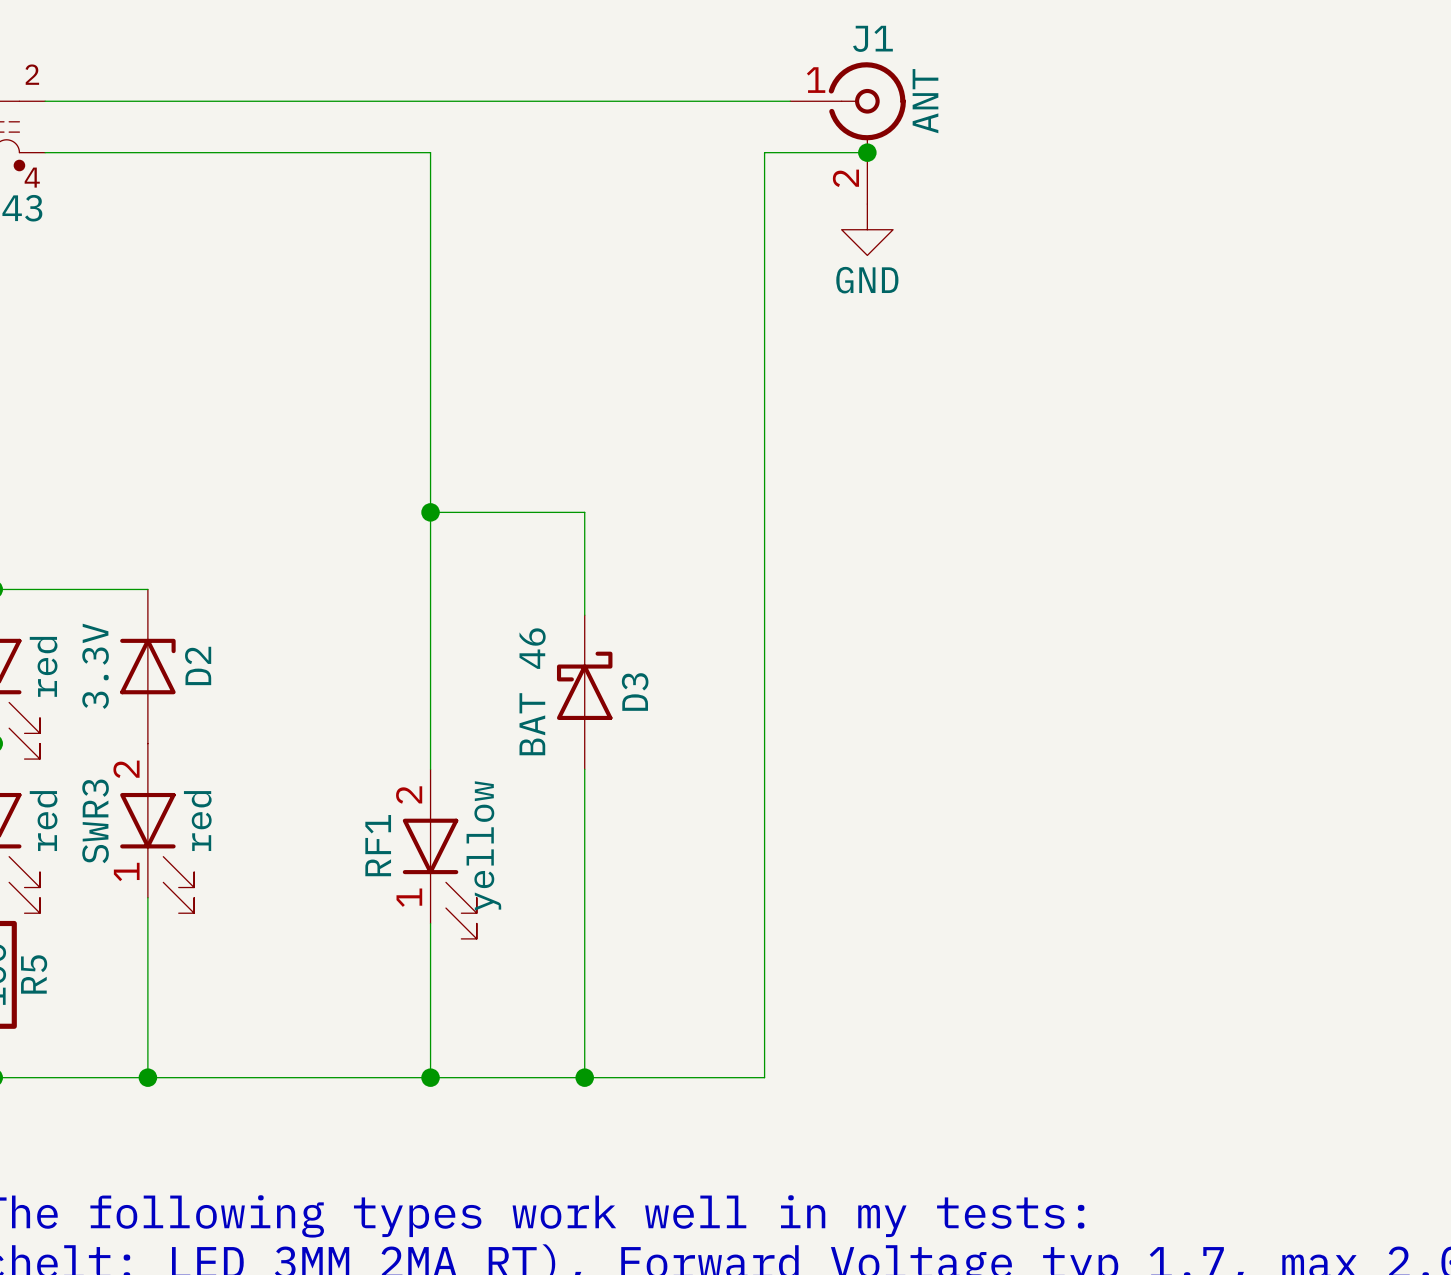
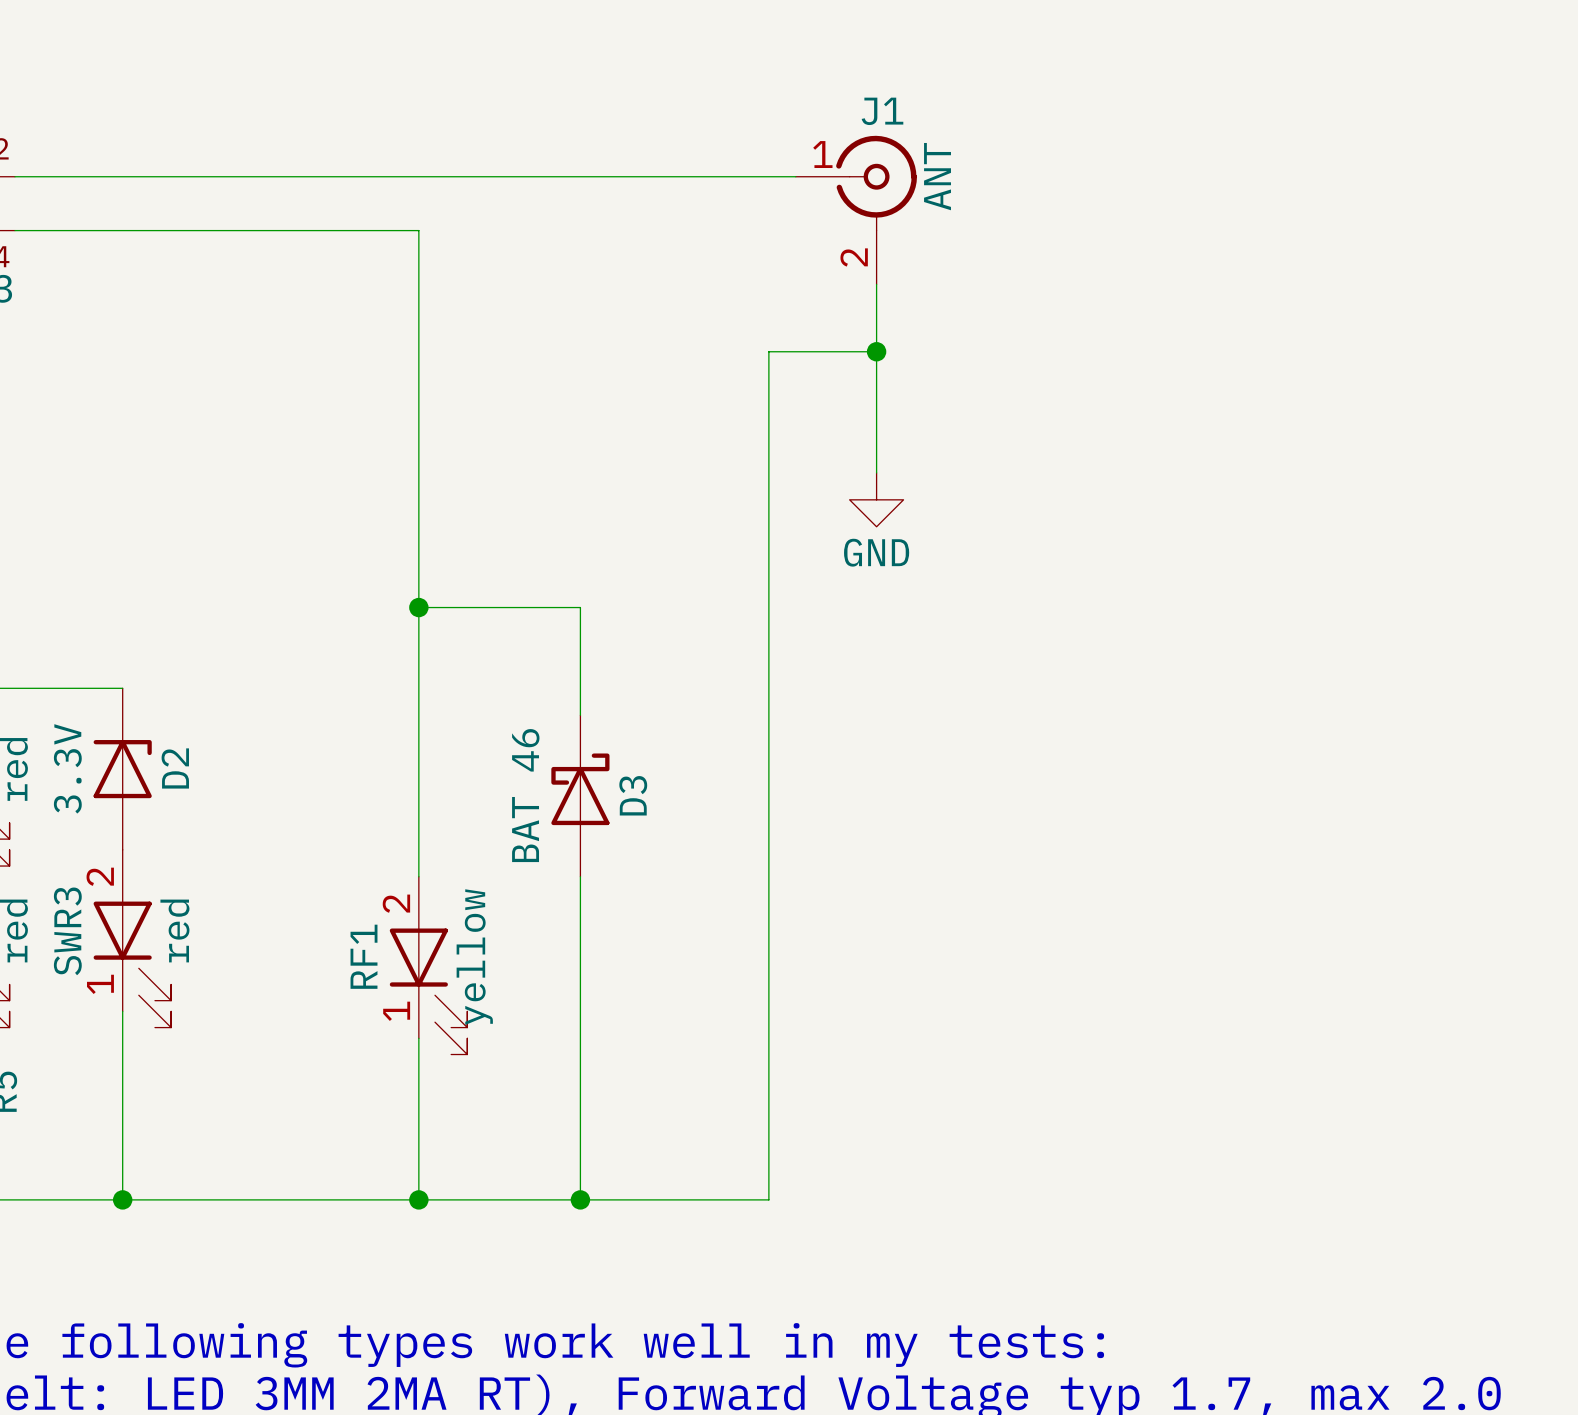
wire: (867, 152) (764, 152) (764, 268) -> (876, 351) (768, 351)
junction position: (867, 152) -> (876, 351)
wire: none -> (876, 284) (876, 472)
power symbol position: GND (867, 229) -> GND (876, 499)

